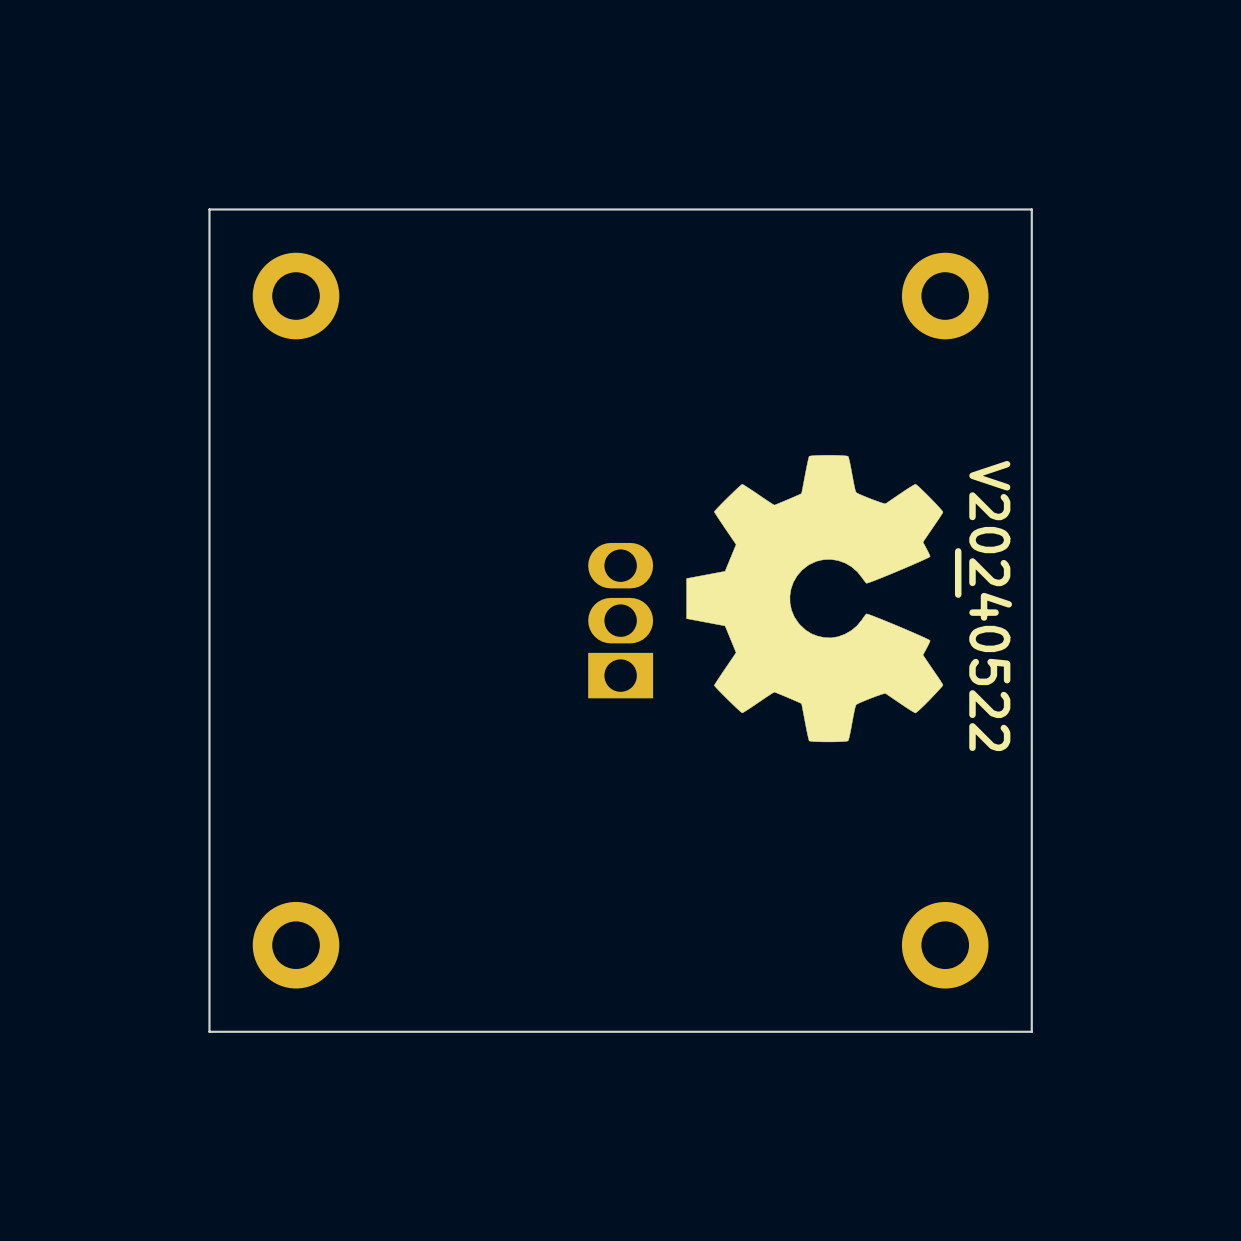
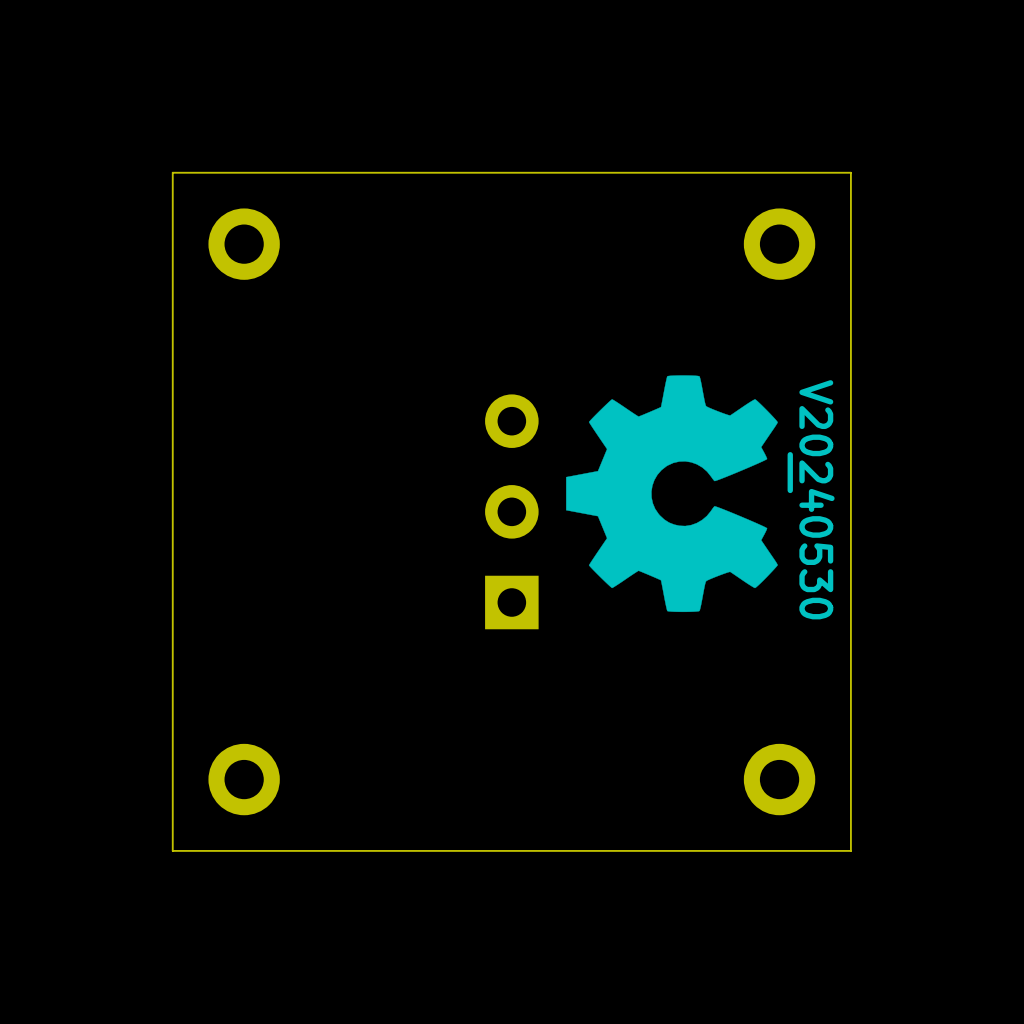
drawing shape: [954, 460, 1013, 752] -> [787, 380, 835, 620]
part footprint: [588, 542, 654, 699] -> [485, 394, 539, 630]

